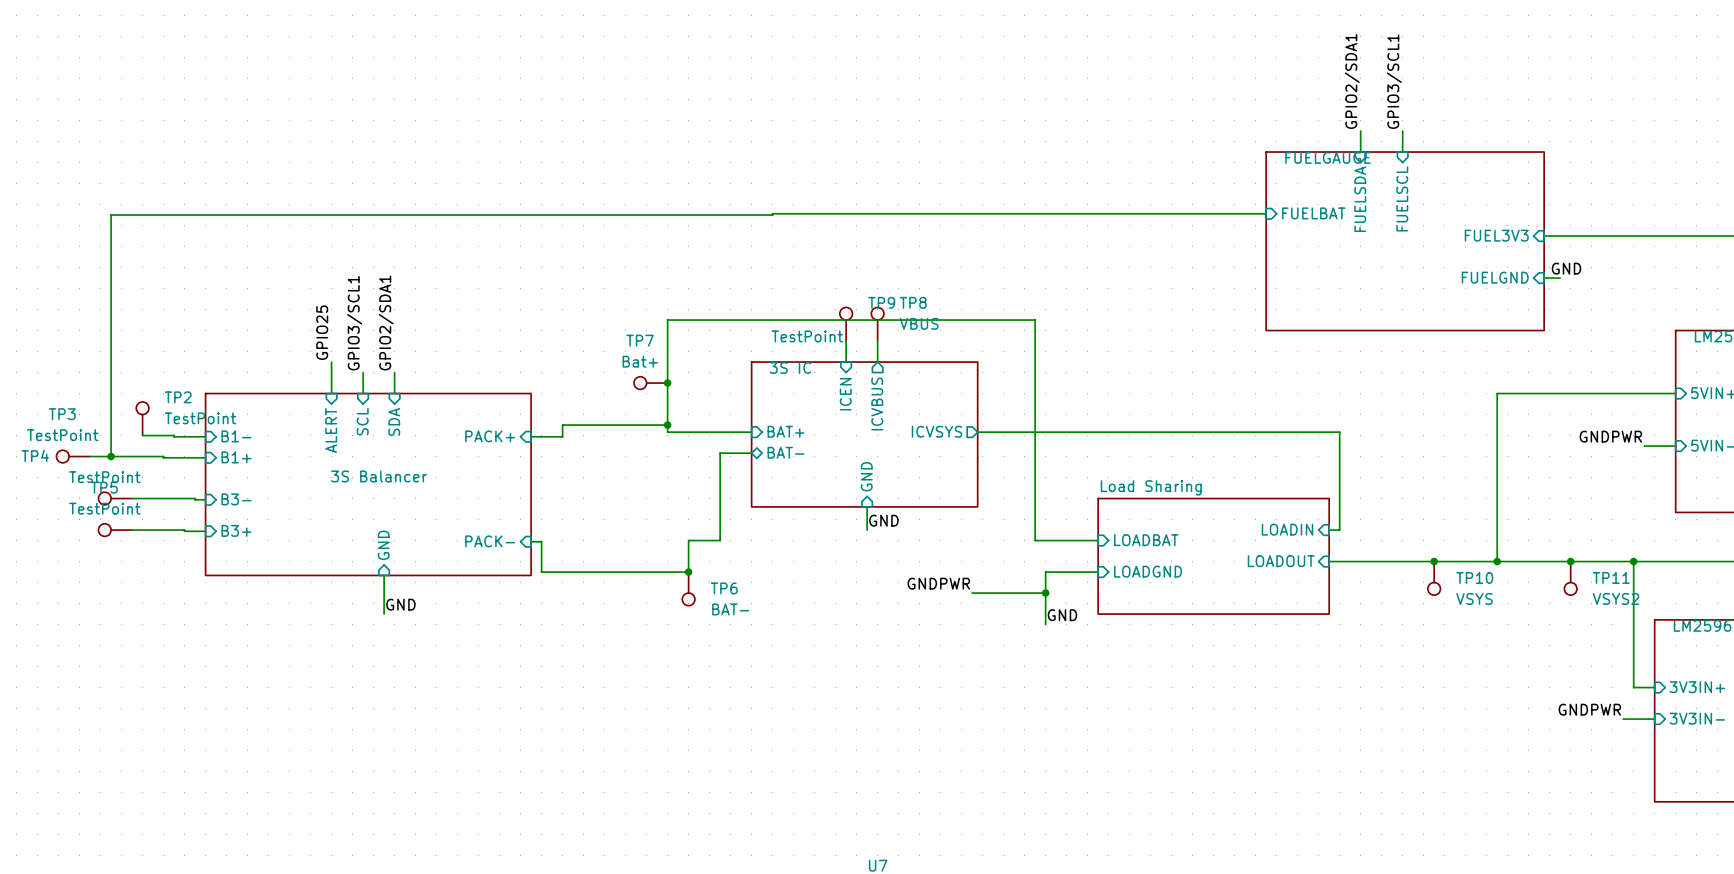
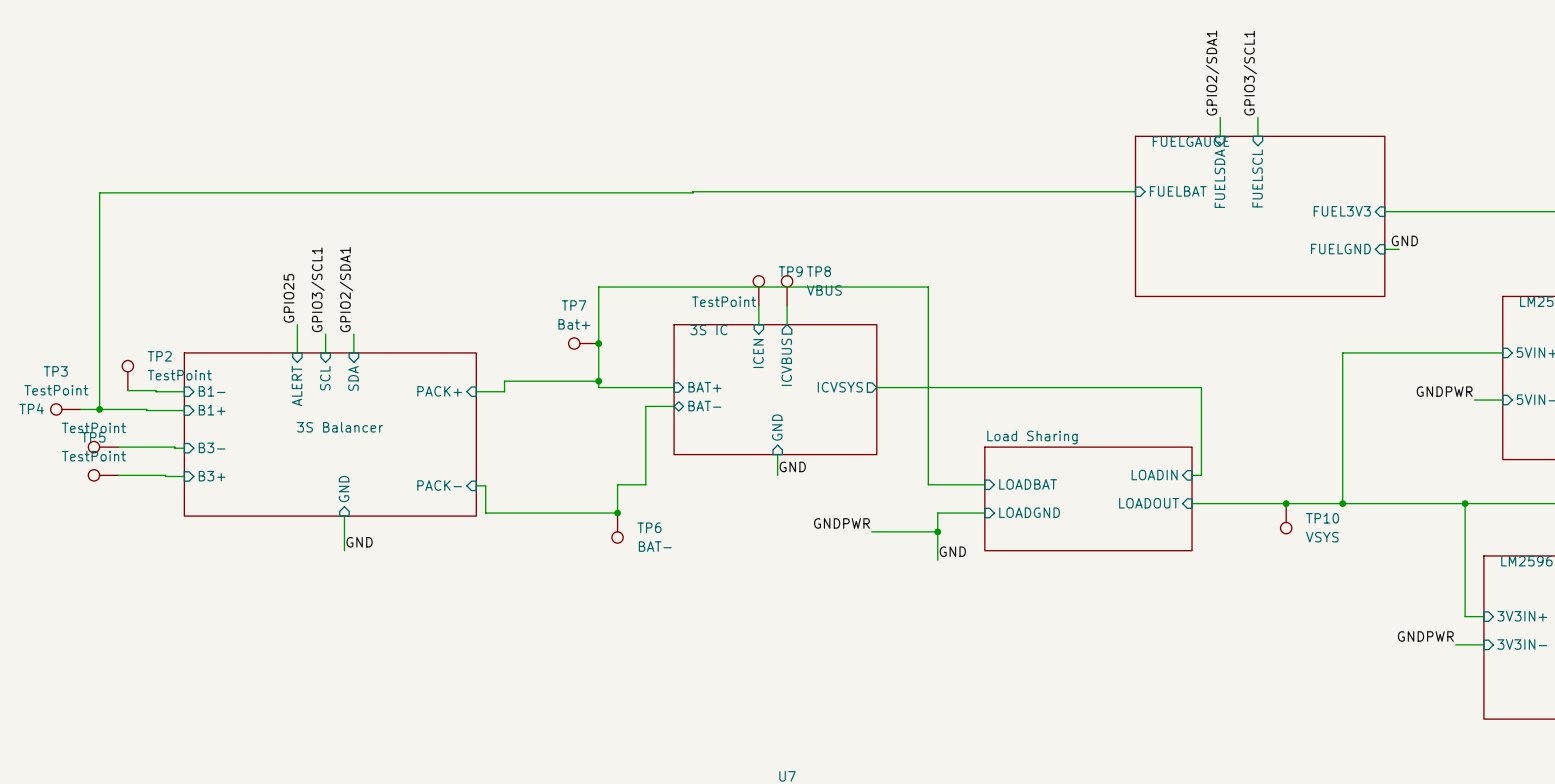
junction: (1570, 561) -> none
TP11: VSYS2 (1570, 578) -> none

